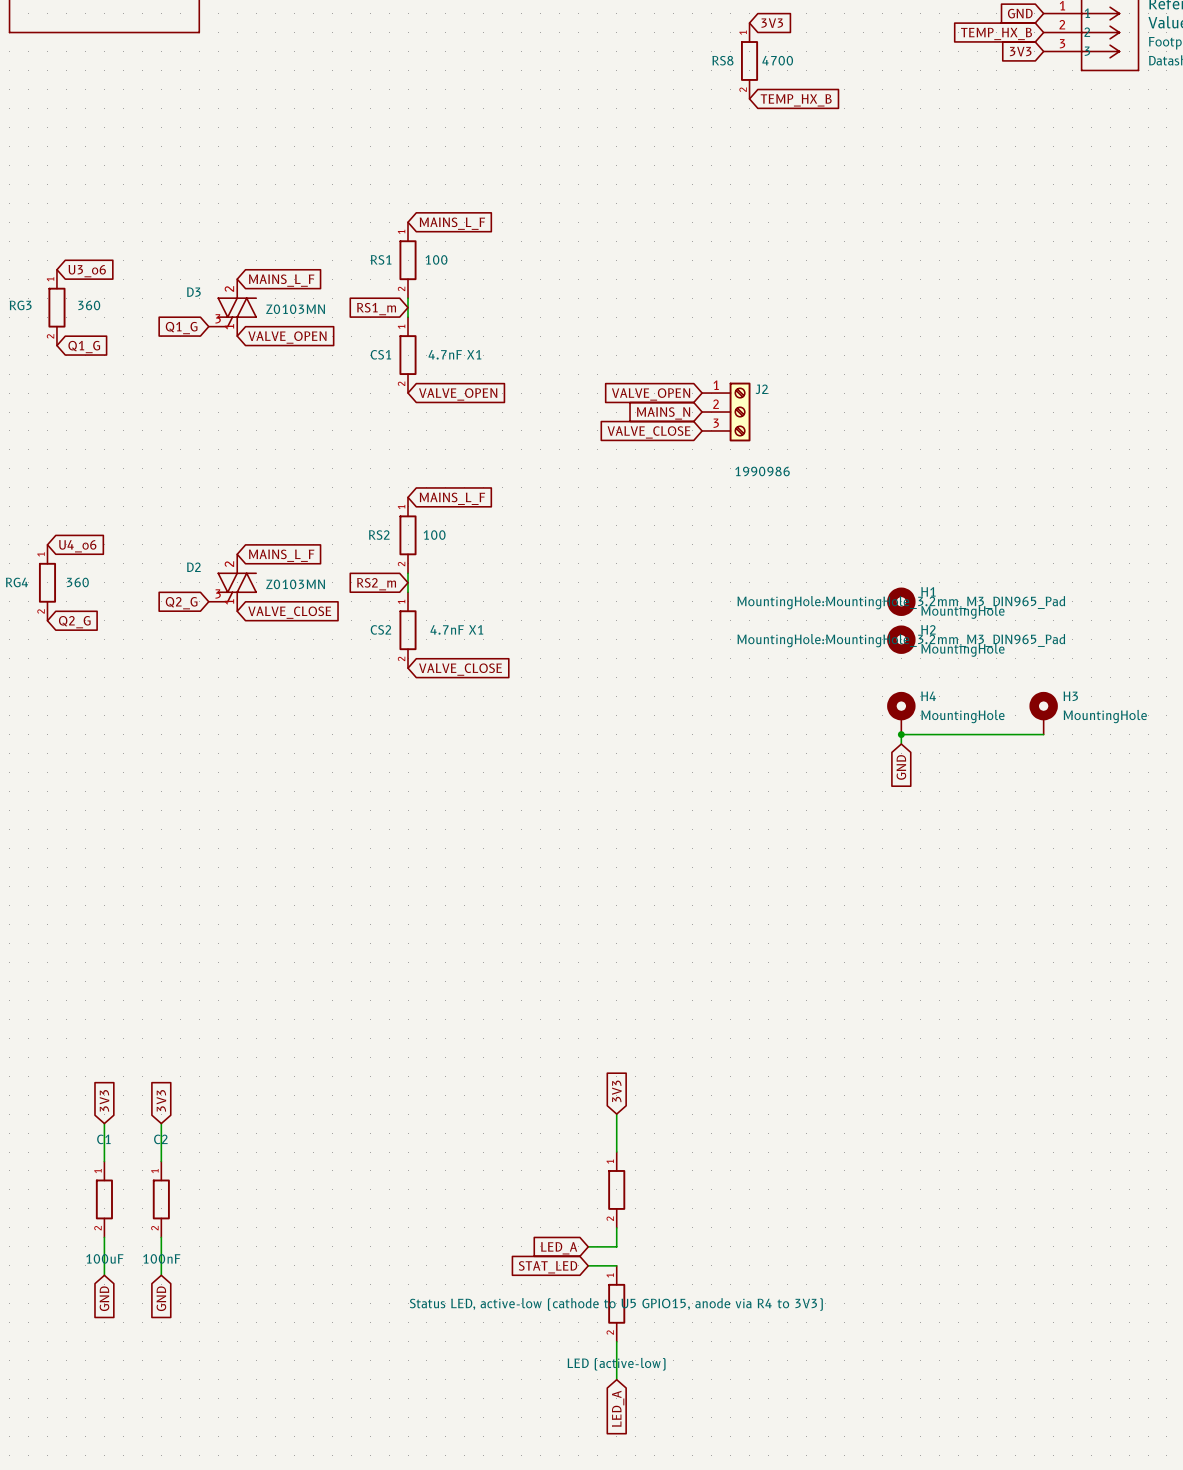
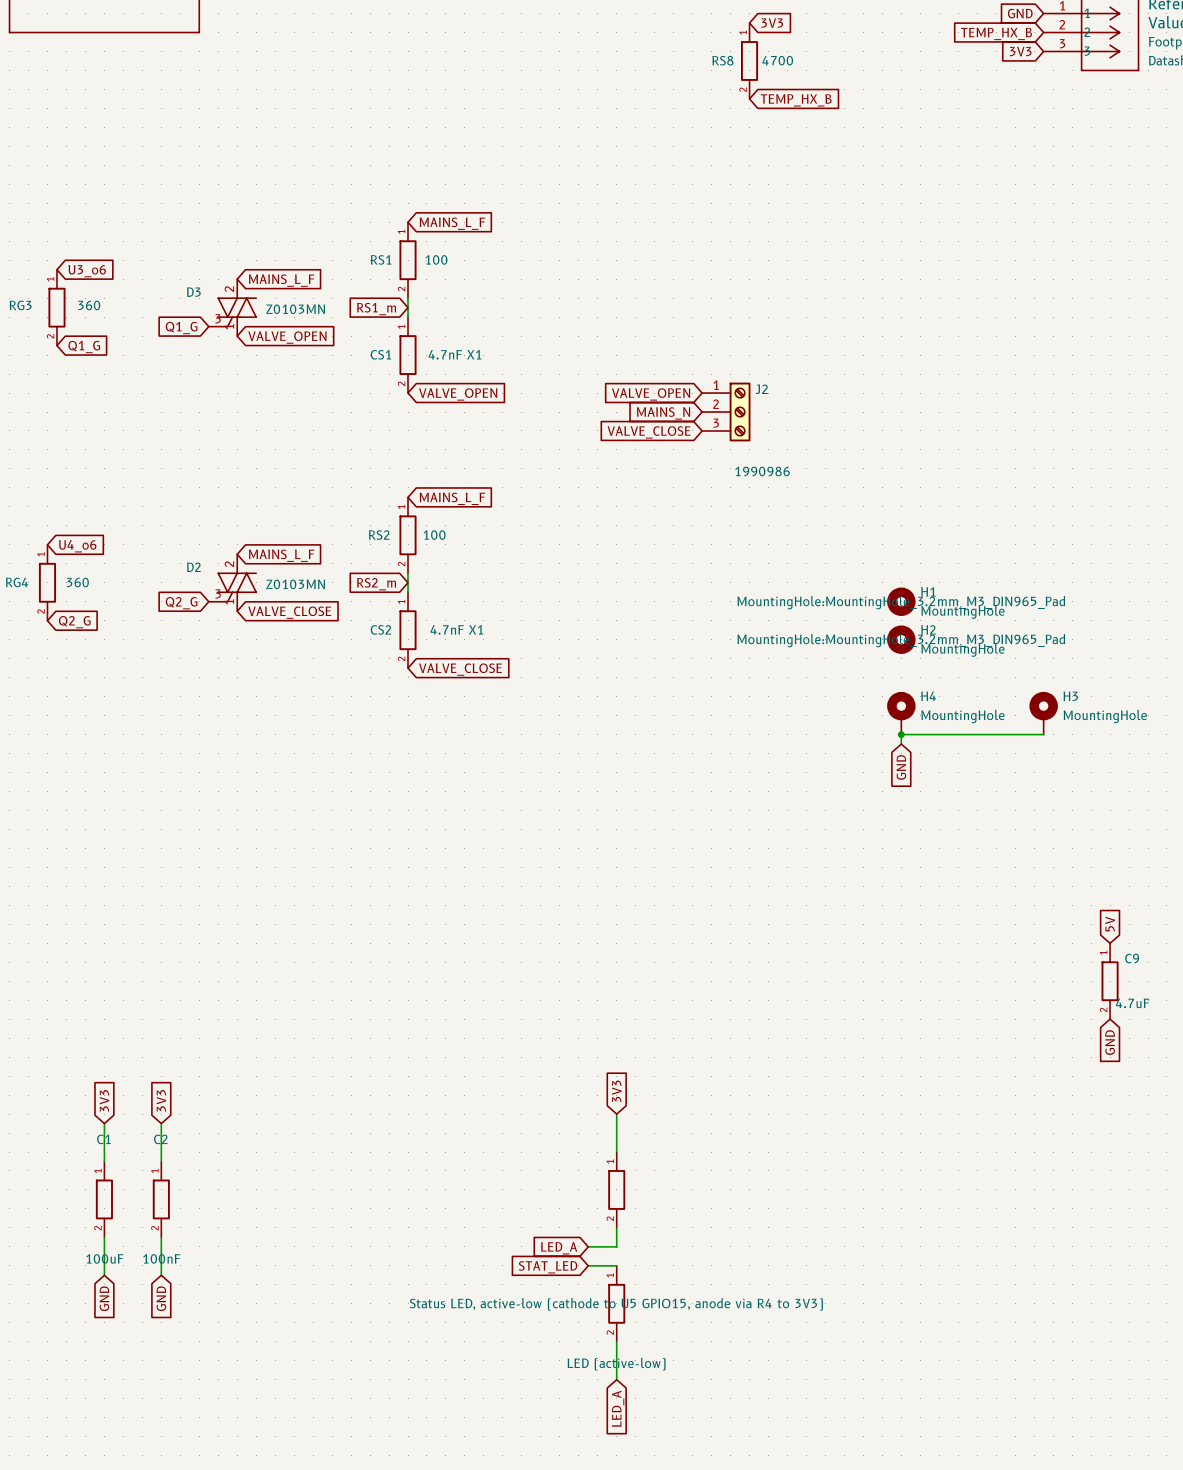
global label: none -> 5V (1110, 924)
C9: none -> 4.7uF (1110, 981)
global label: none -> GND (1110, 1042)

